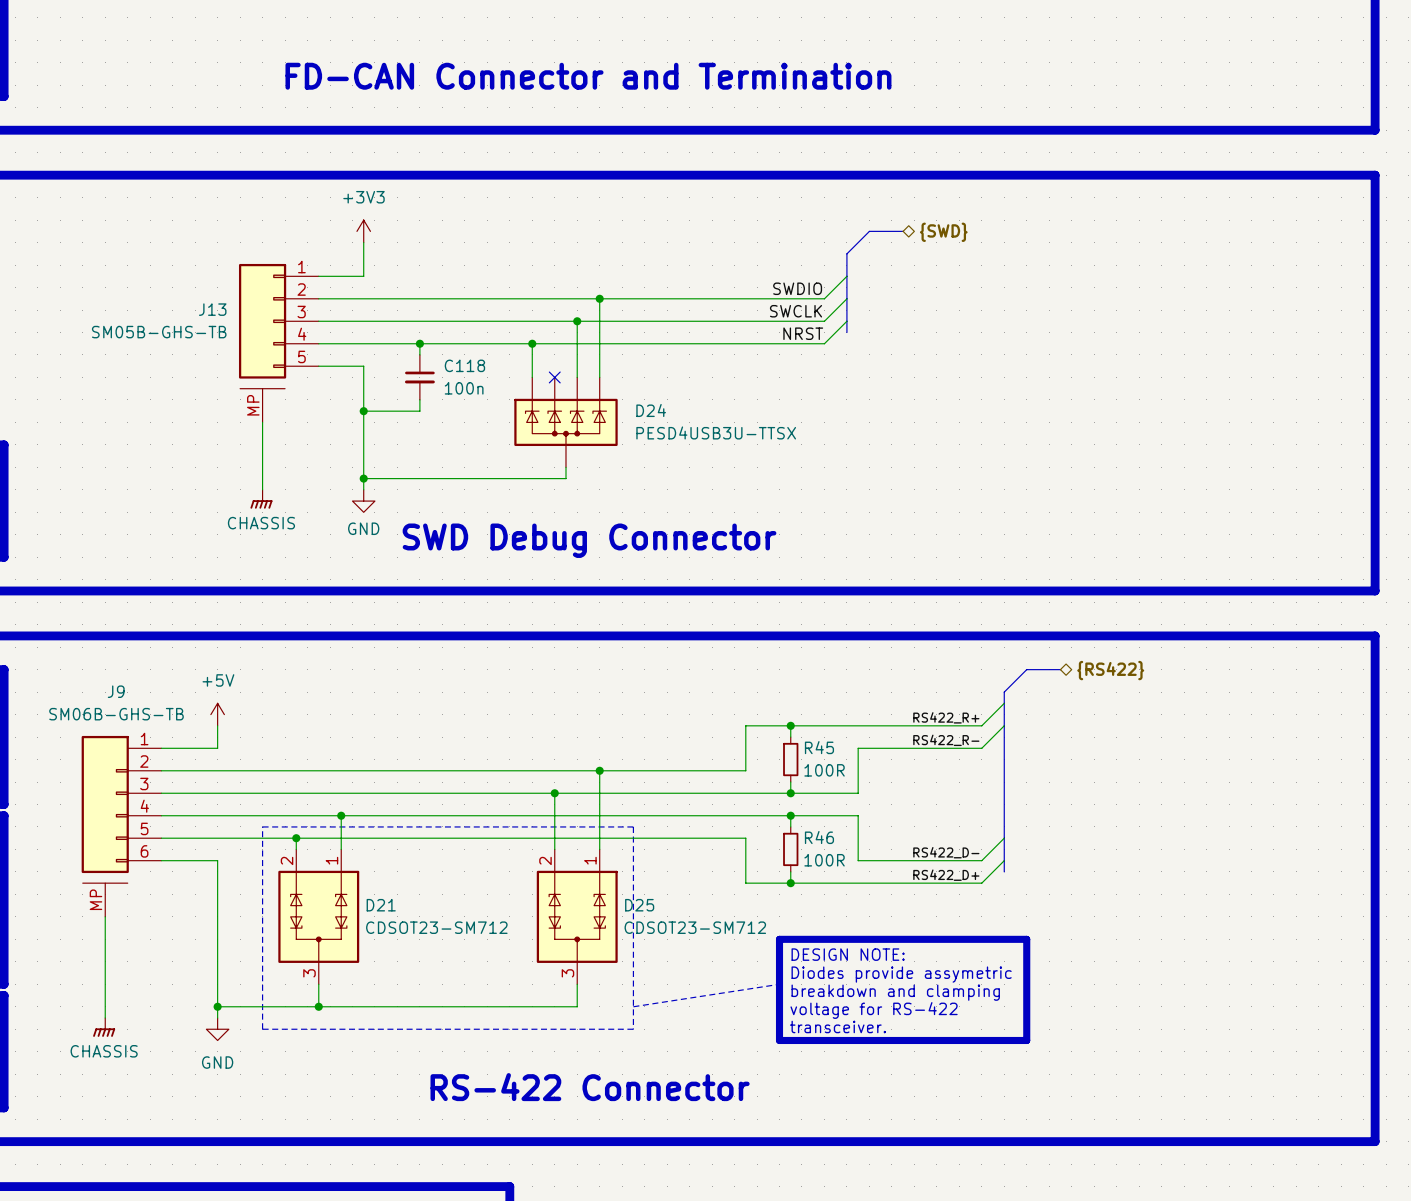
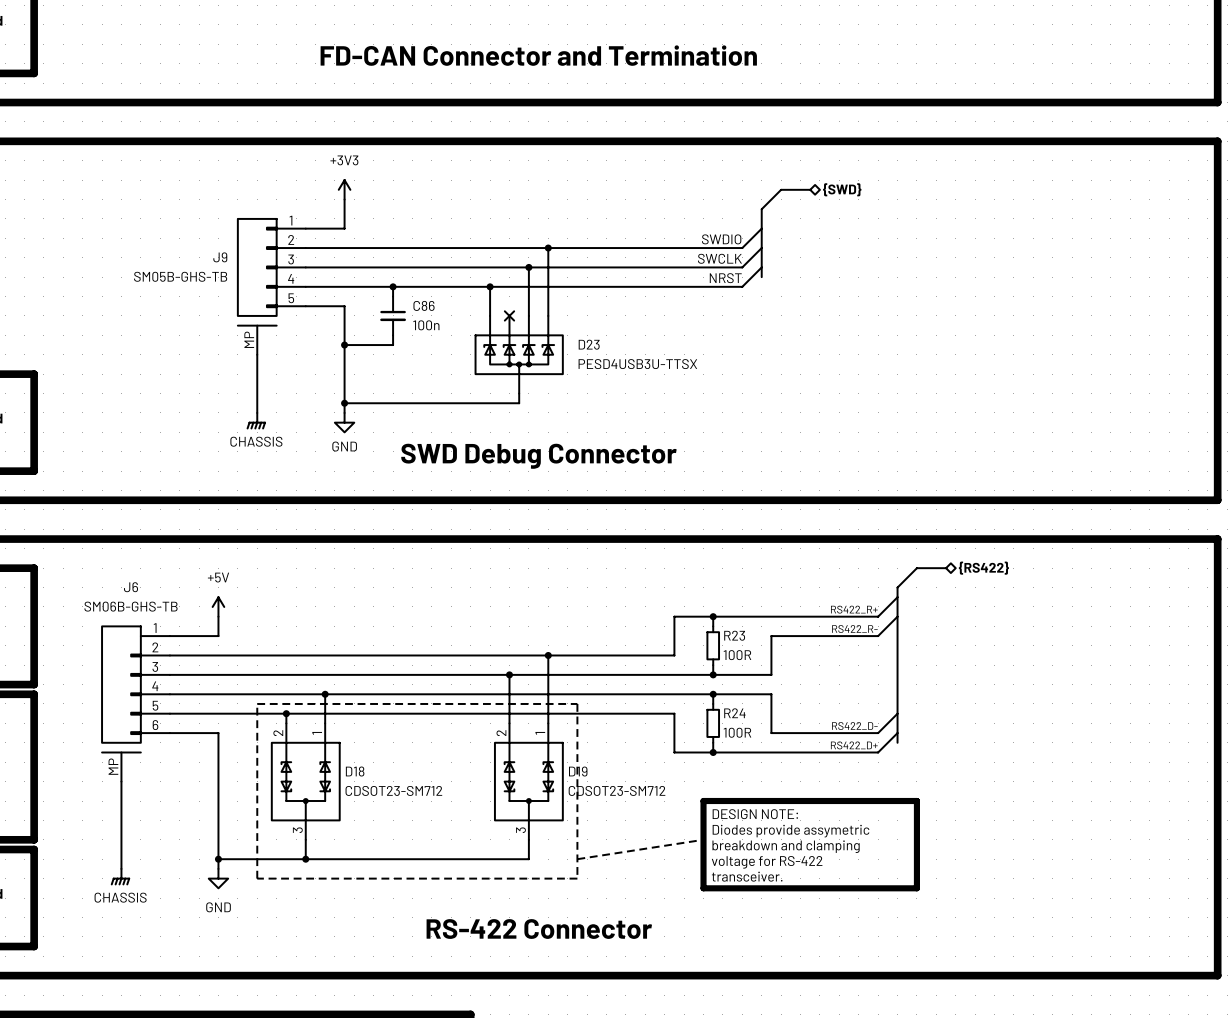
J13 name: J13 (212, 309) -> J9 (220, 257)
C118 name: C118 (464, 365) -> C86 (424, 305)
D24 name: D24 (651, 410) -> D23 (589, 344)
J9 name: J9 (116, 691) -> J6 (131, 587)
R45 name: R45 (819, 747) -> R23 (734, 635)
R46 name: R46 (819, 837) -> R24 (734, 713)
D21 name: D21 (381, 905) -> D18 (355, 771)
D25 name: D25 (639, 905) -> D19 (578, 771)

